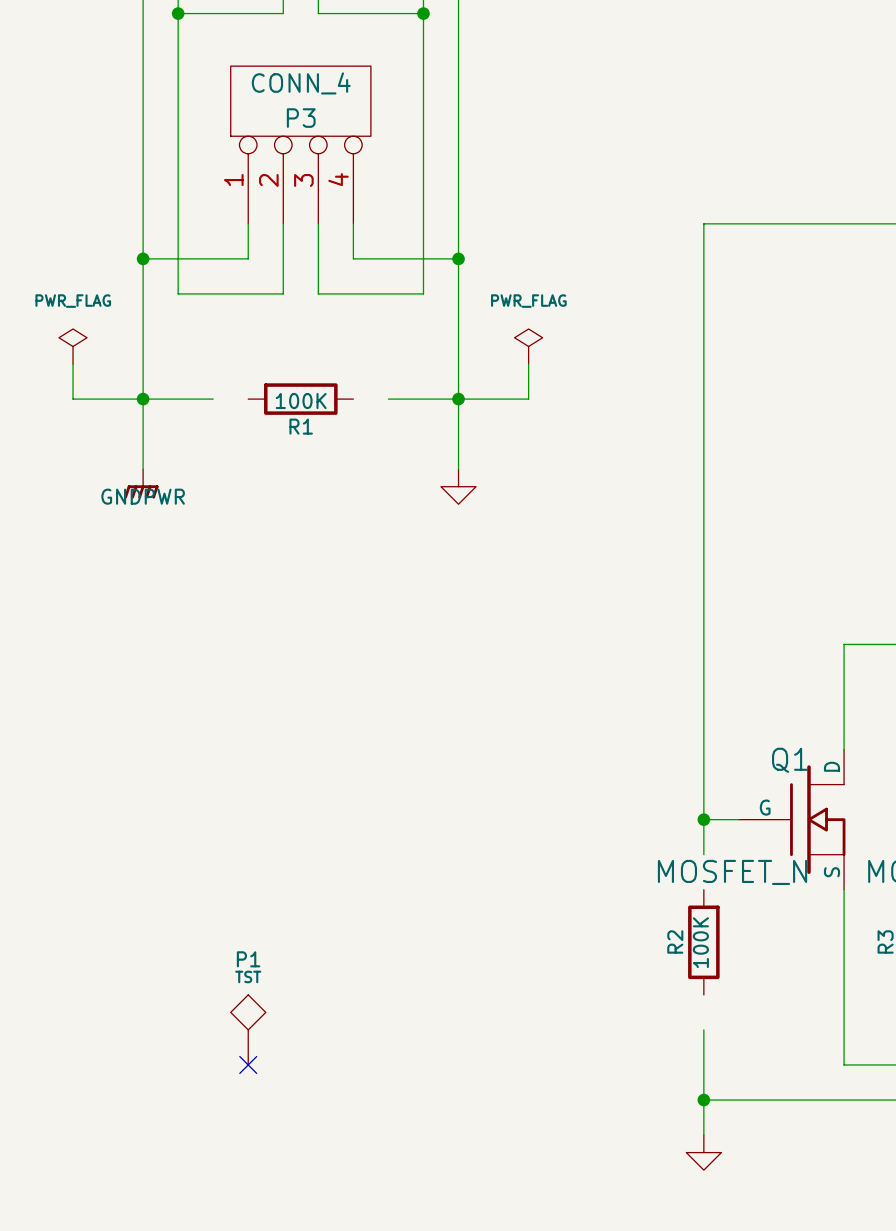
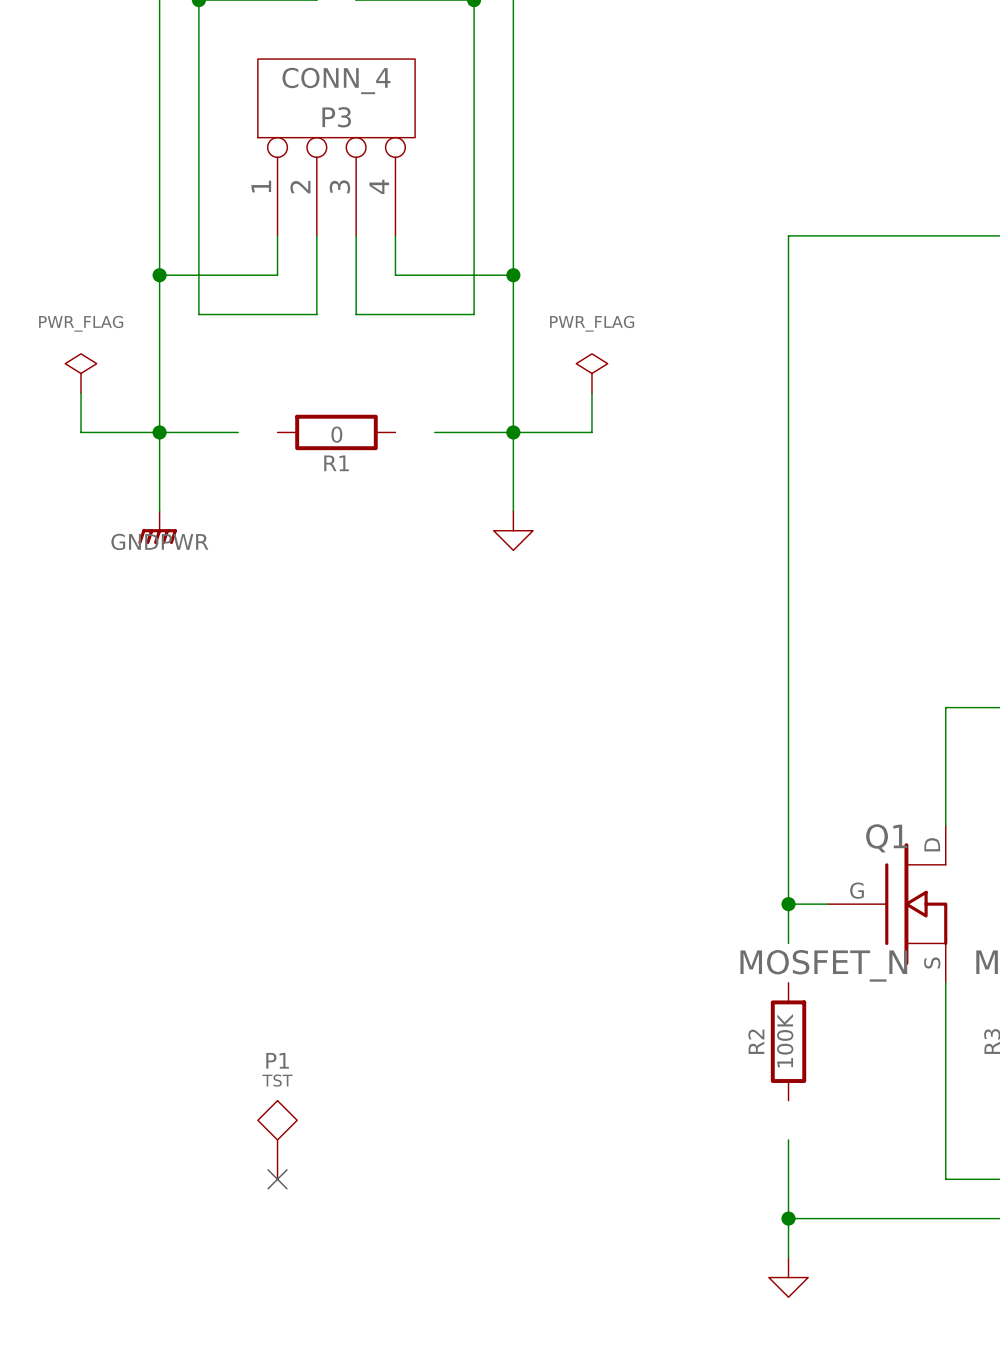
R1 value: 100K (301, 401) -> 0 (336, 434)

